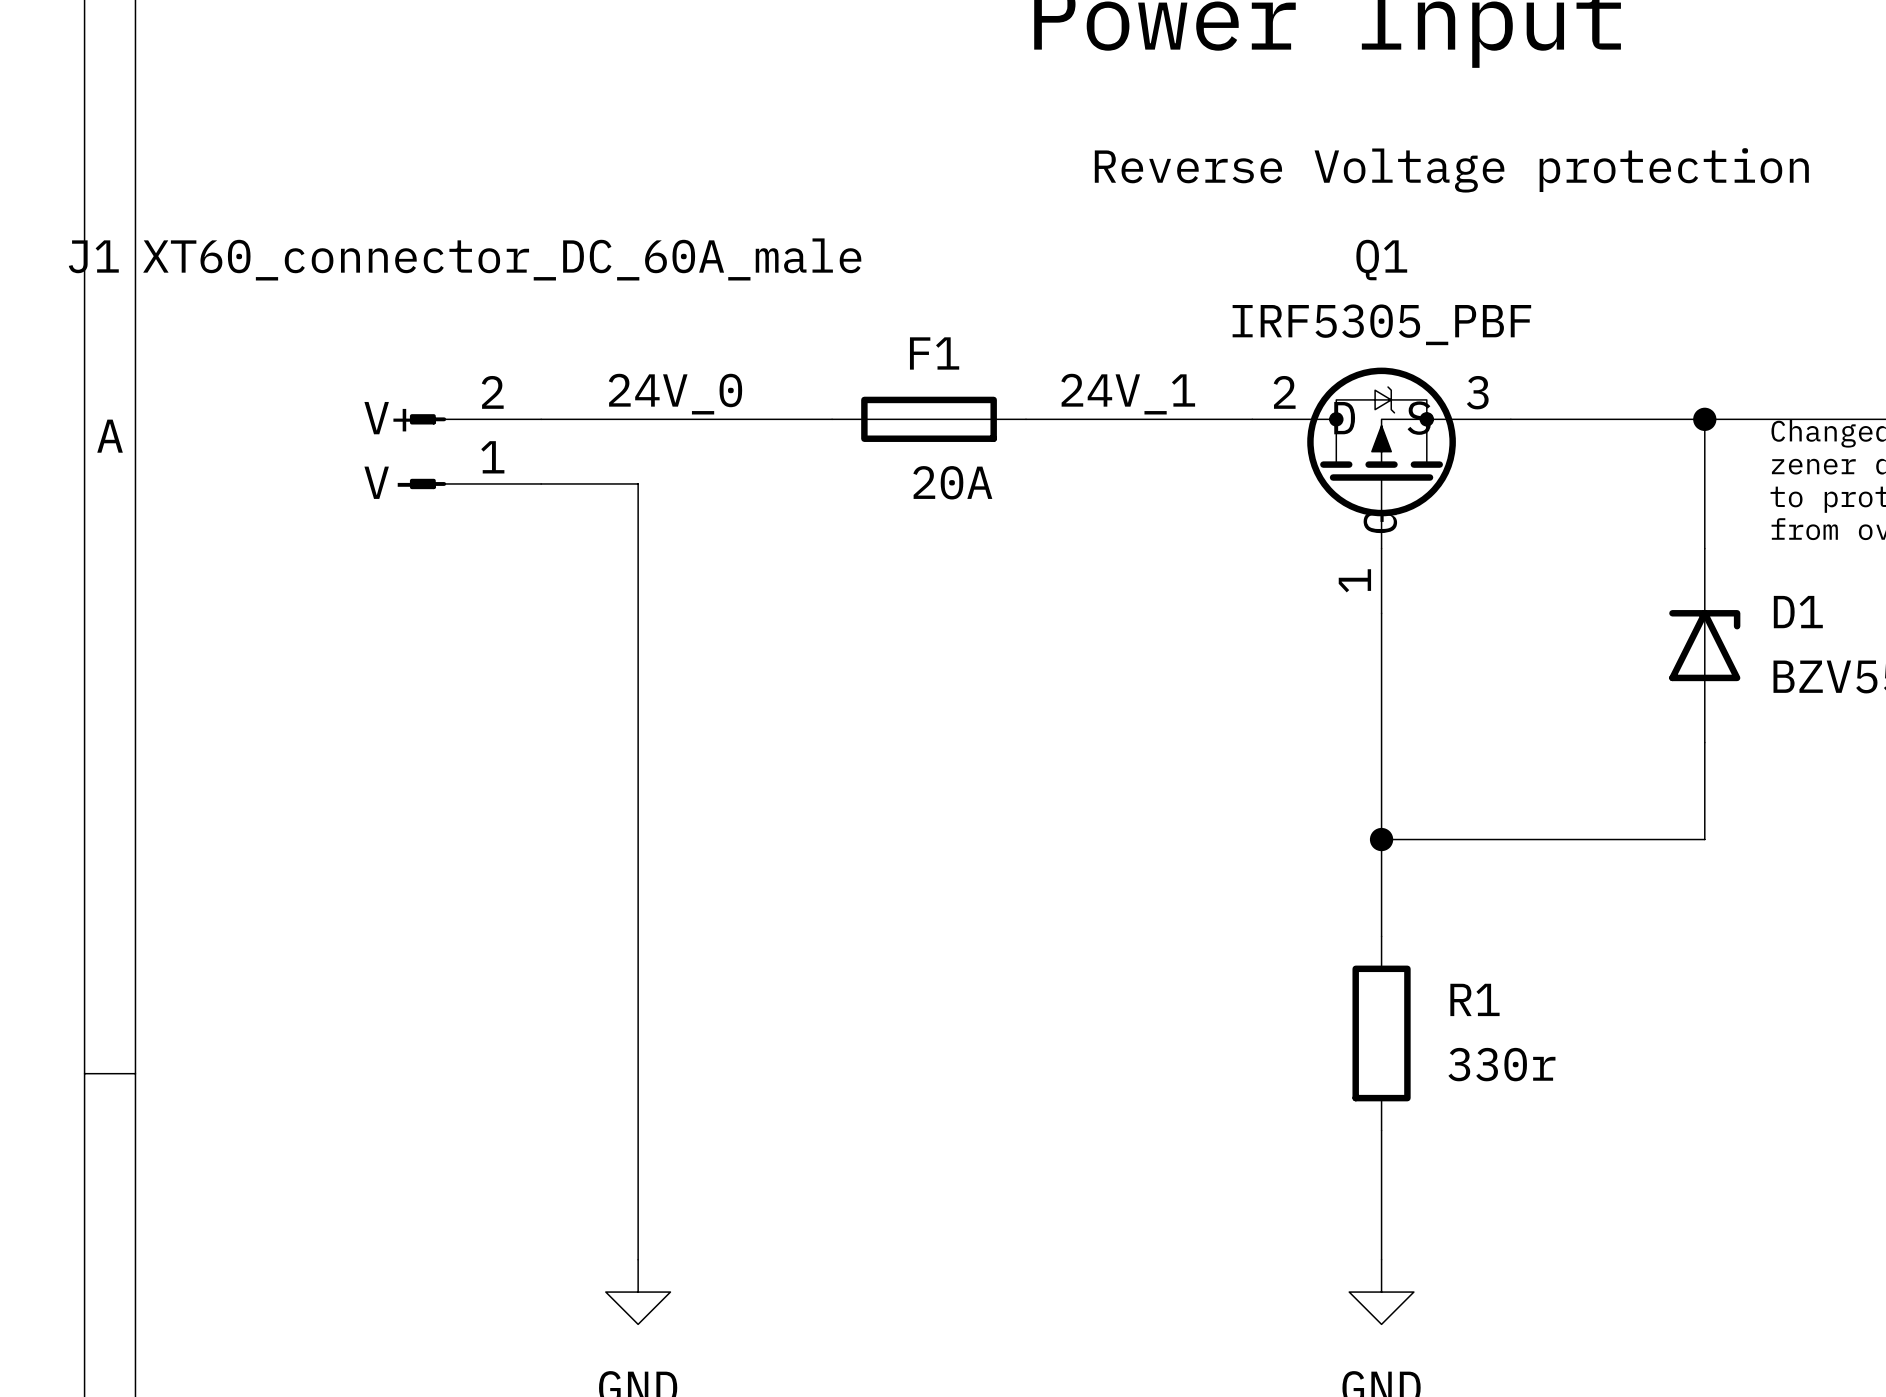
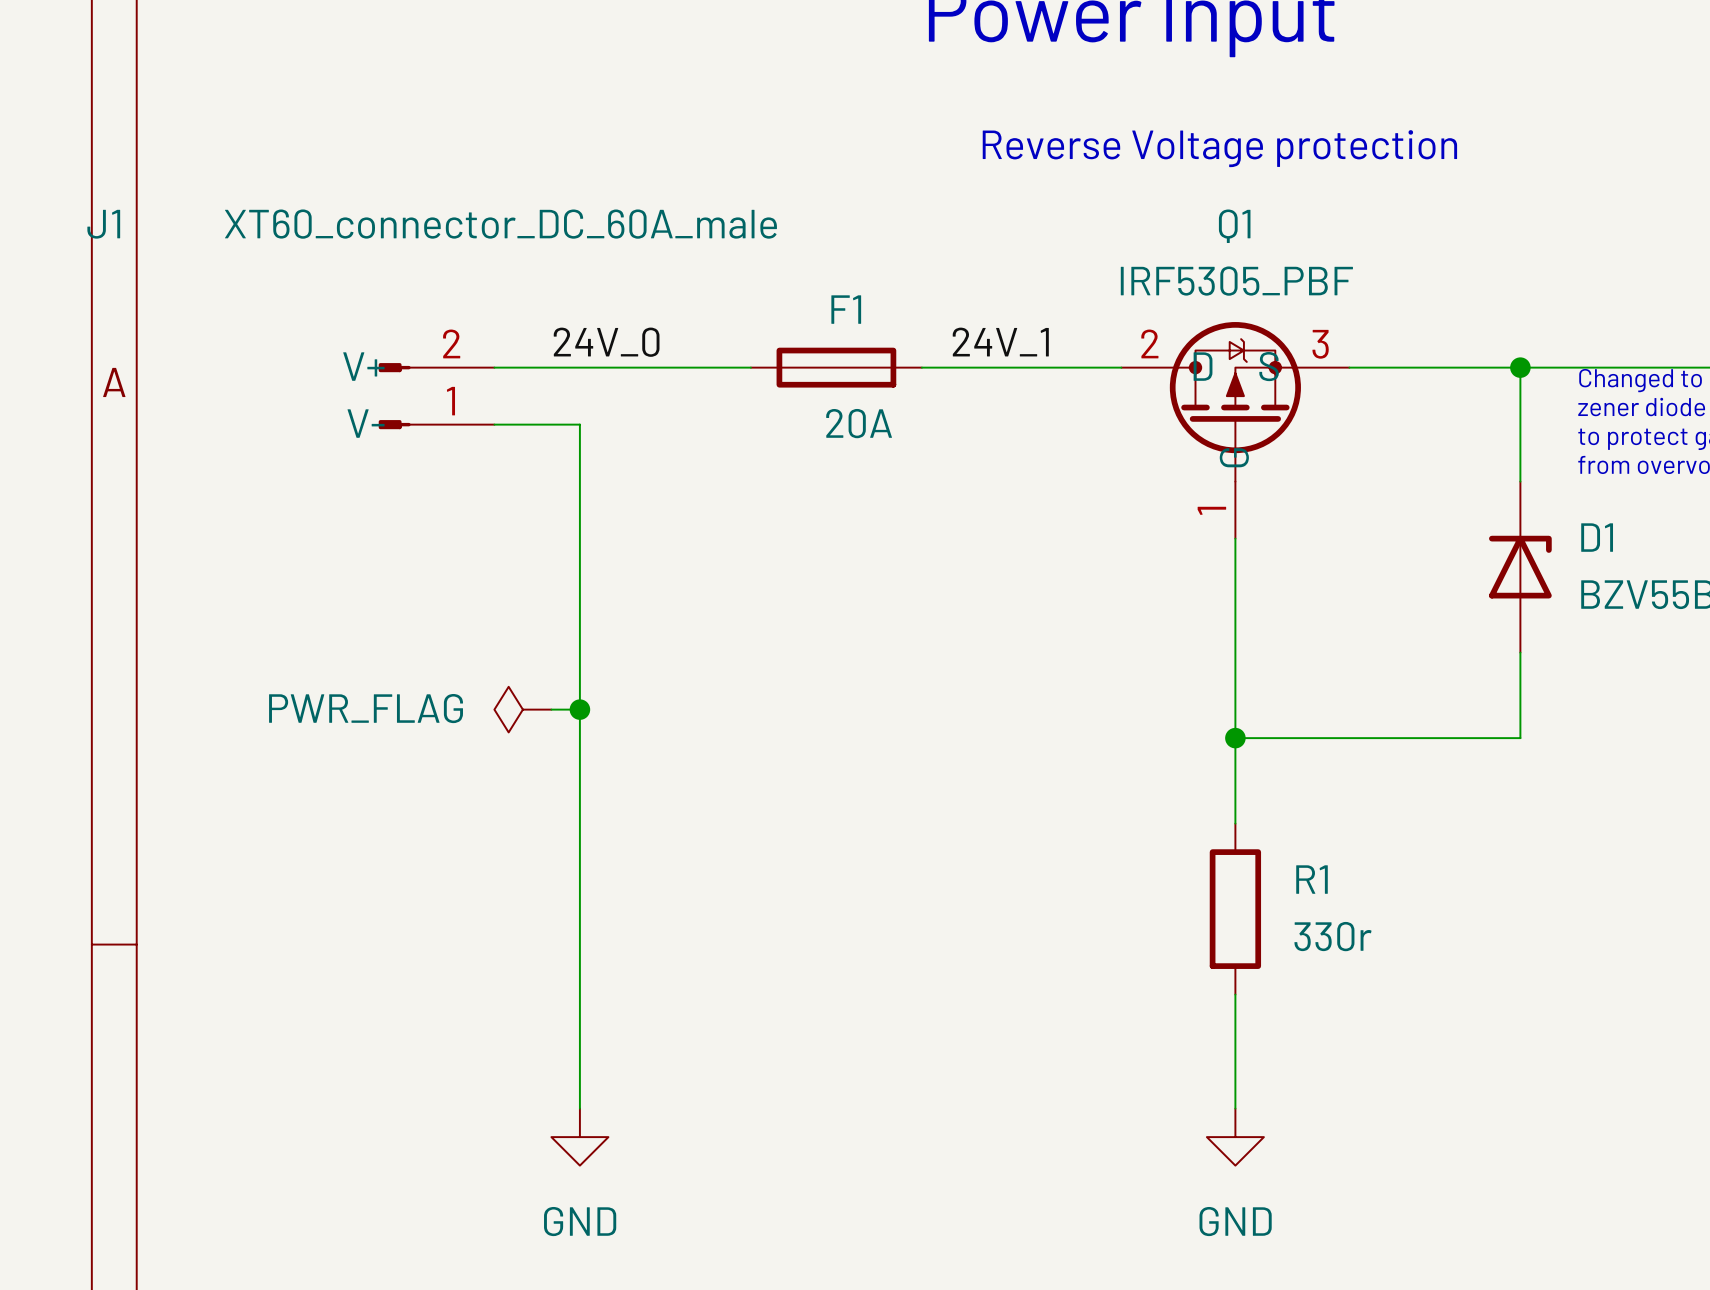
power symbol: none -> PWR_FLAG (522, 709)
wire: none -> (551, 709) (579, 709)
junction: none -> (579, 709)

